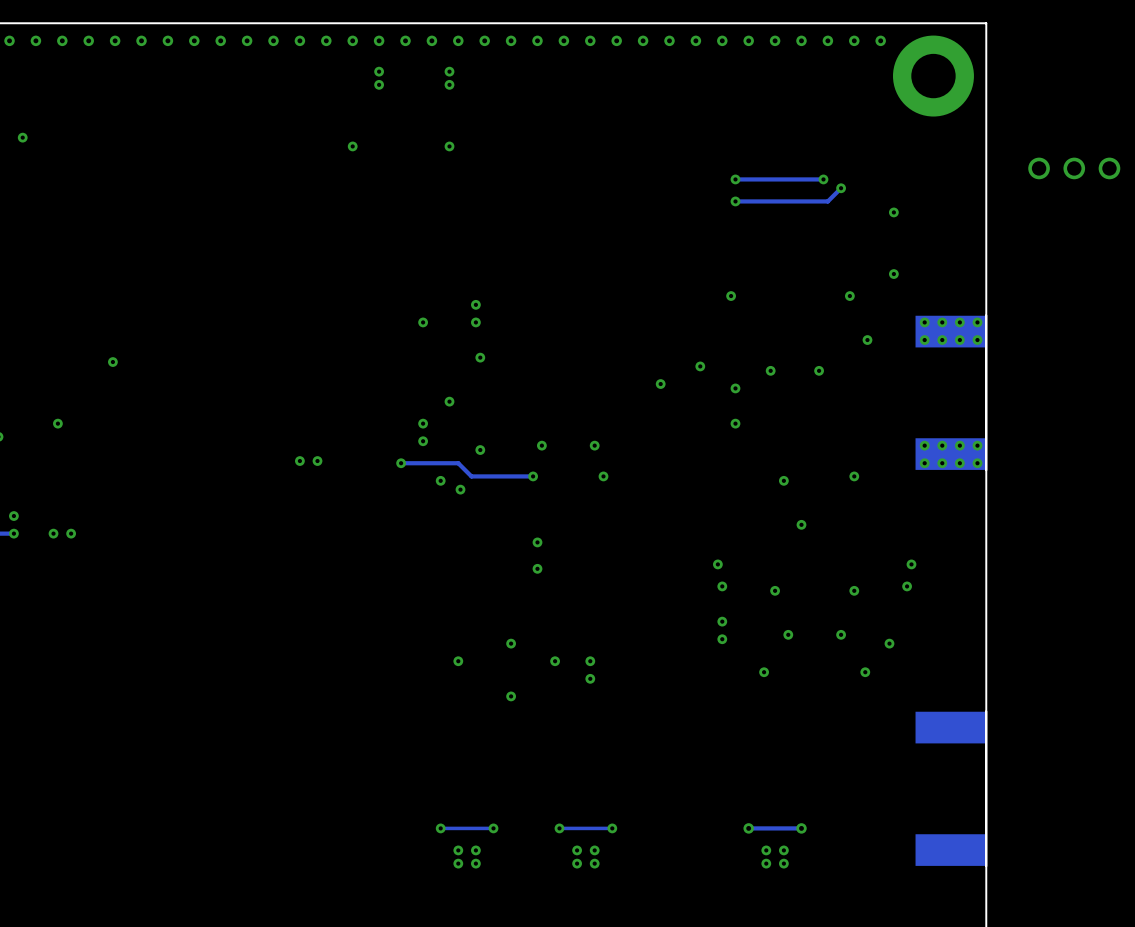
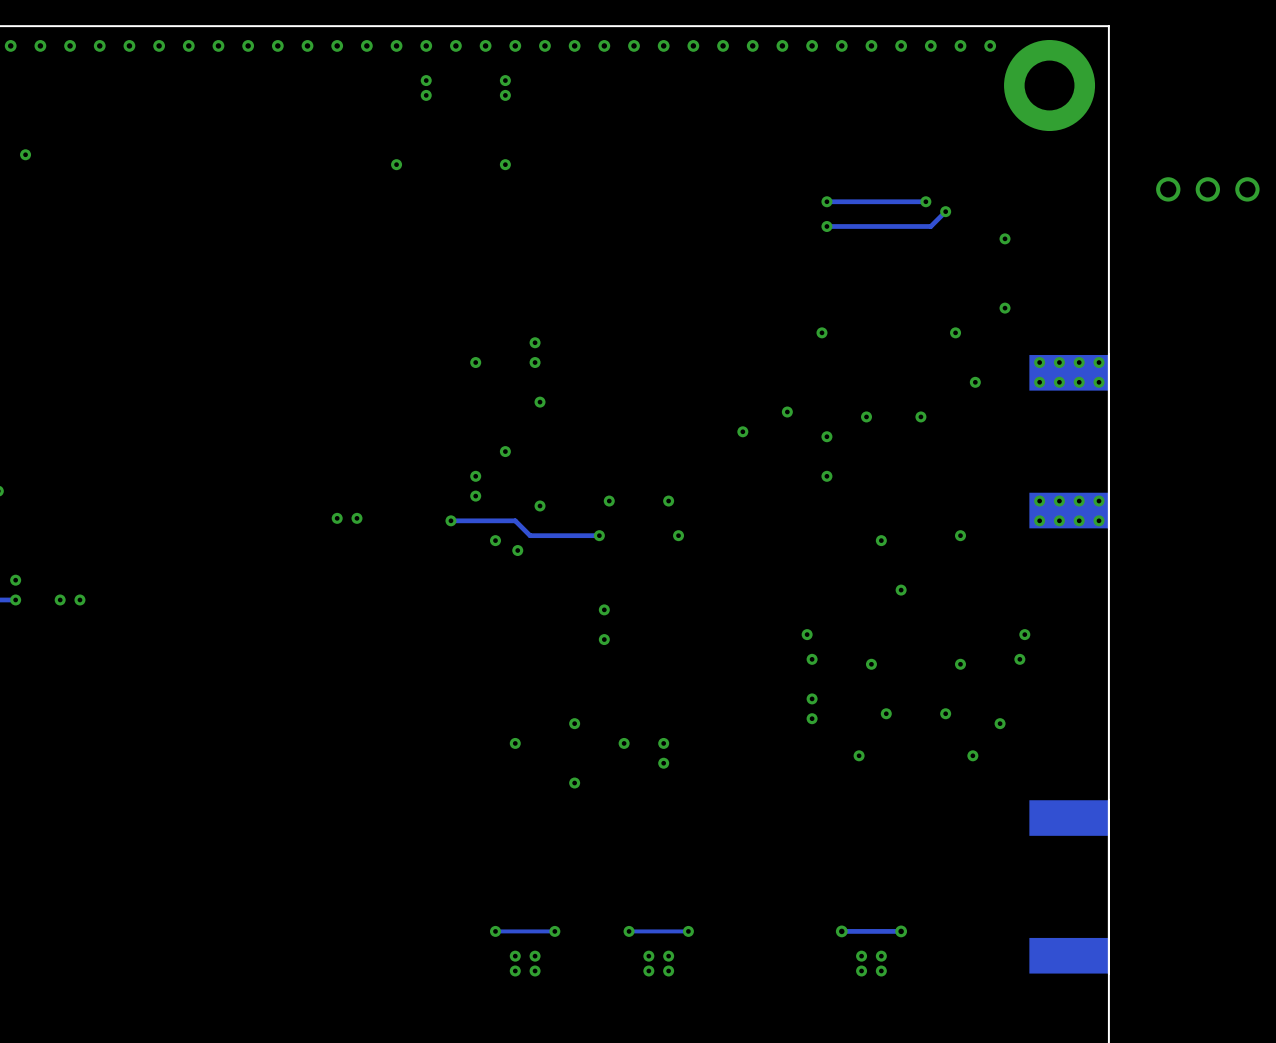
via: (112, 362) -> none
via: (57, 423) -> none

